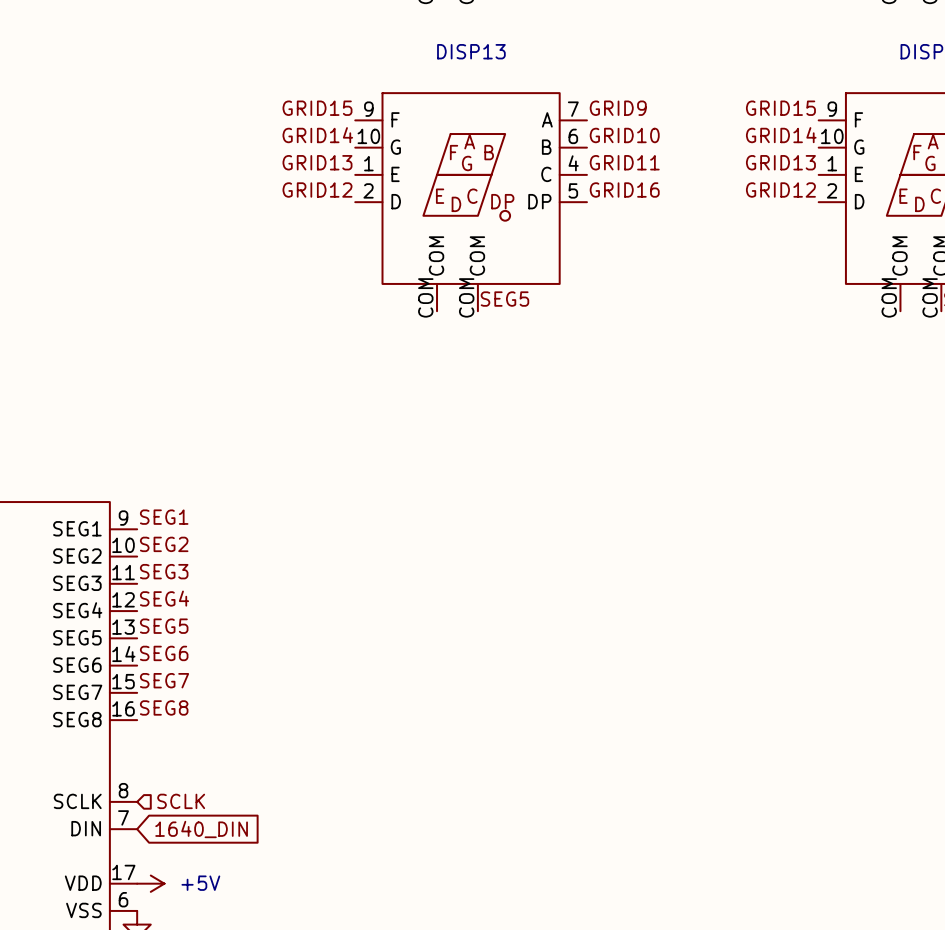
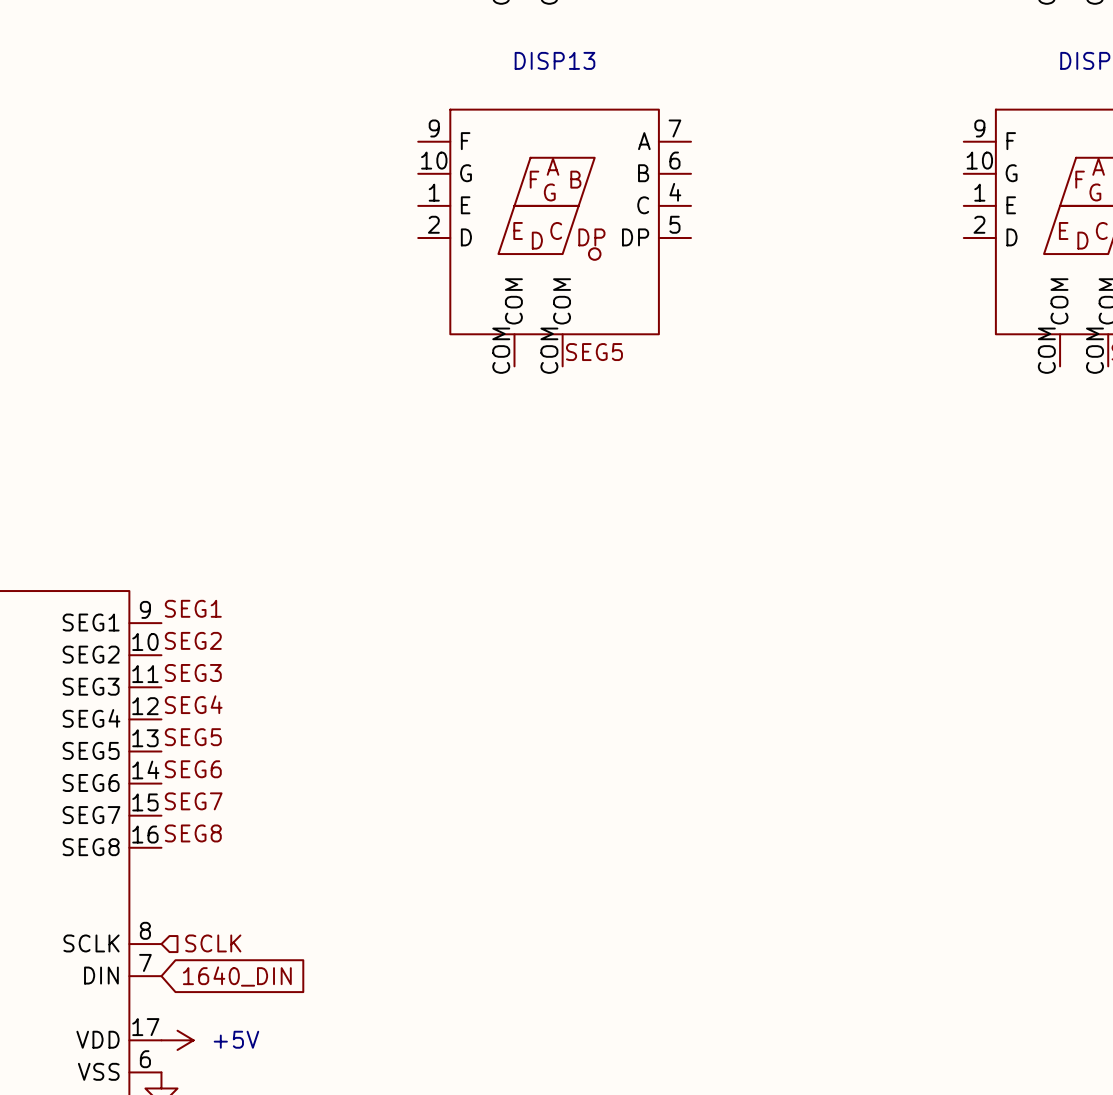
label: GRID15 (317, 108) -> none
label: GRID9 (618, 108) -> none
label: GRID15 (780, 108) -> none
label: GRID14 (317, 135) -> none
label: GRID10 (624, 135) -> none
label: GRID14 (781, 135) -> none
label: GRID13 (317, 162) -> none
label: GRID11 (624, 162) -> none
label: GRID13 (780, 162) -> none
label: GRID12 (317, 190) -> none
label: GRID16 (624, 190) -> none
label: GRID12 (780, 190) -> none

